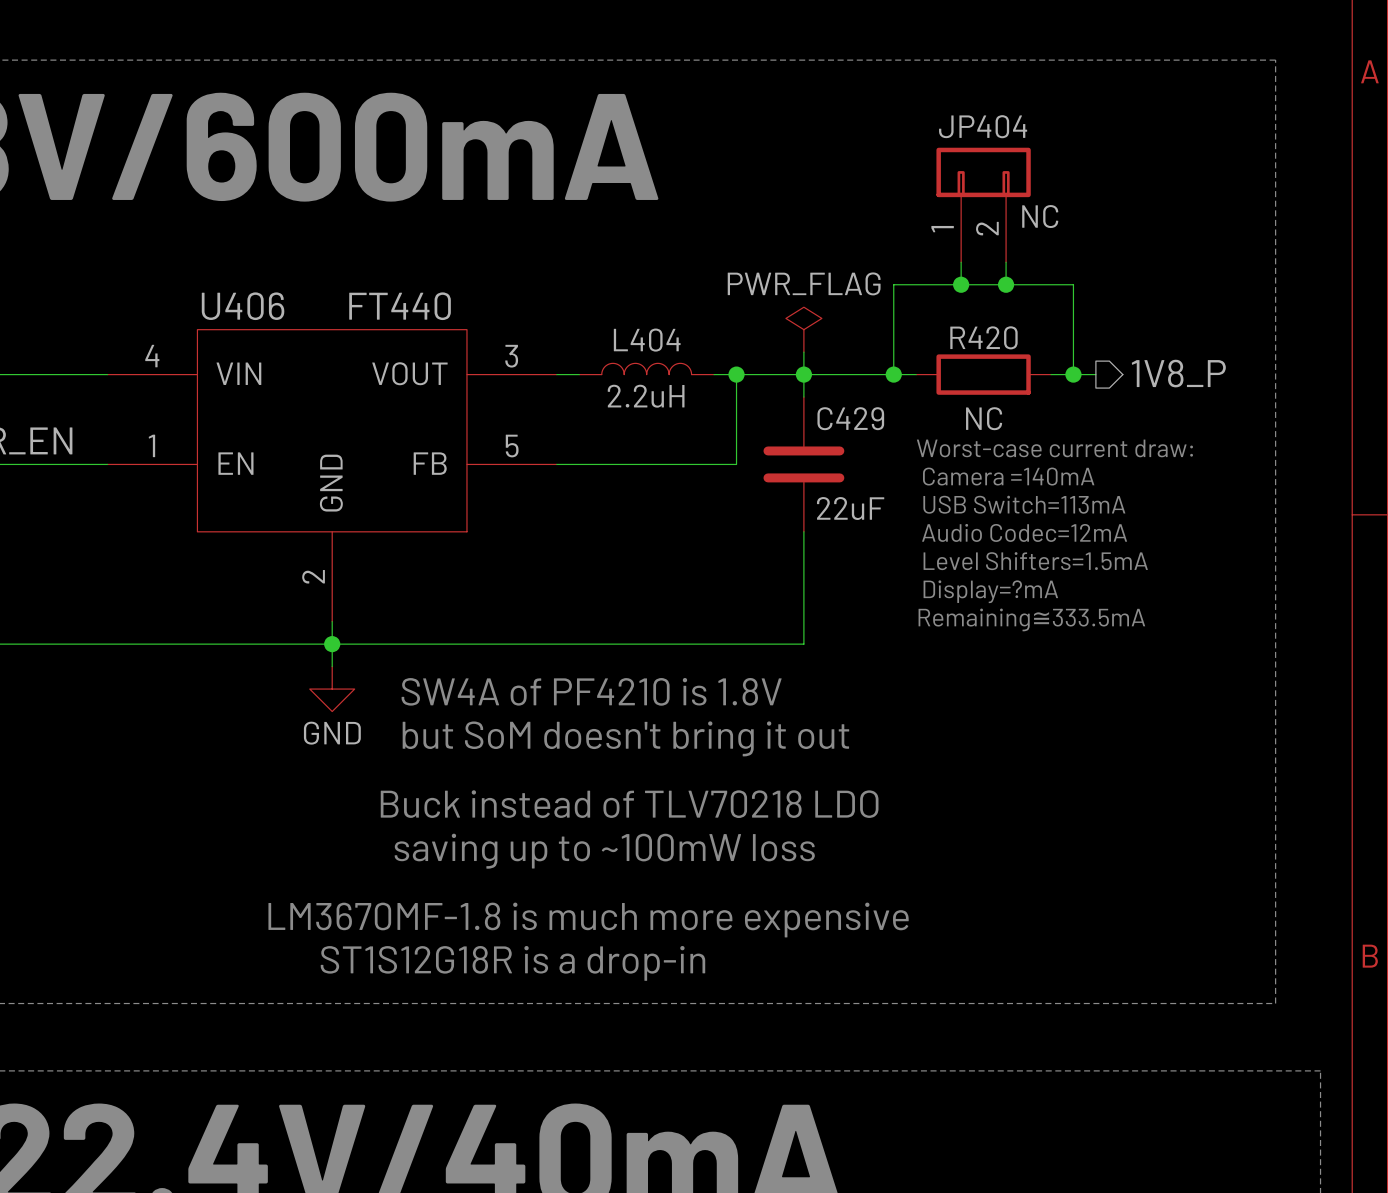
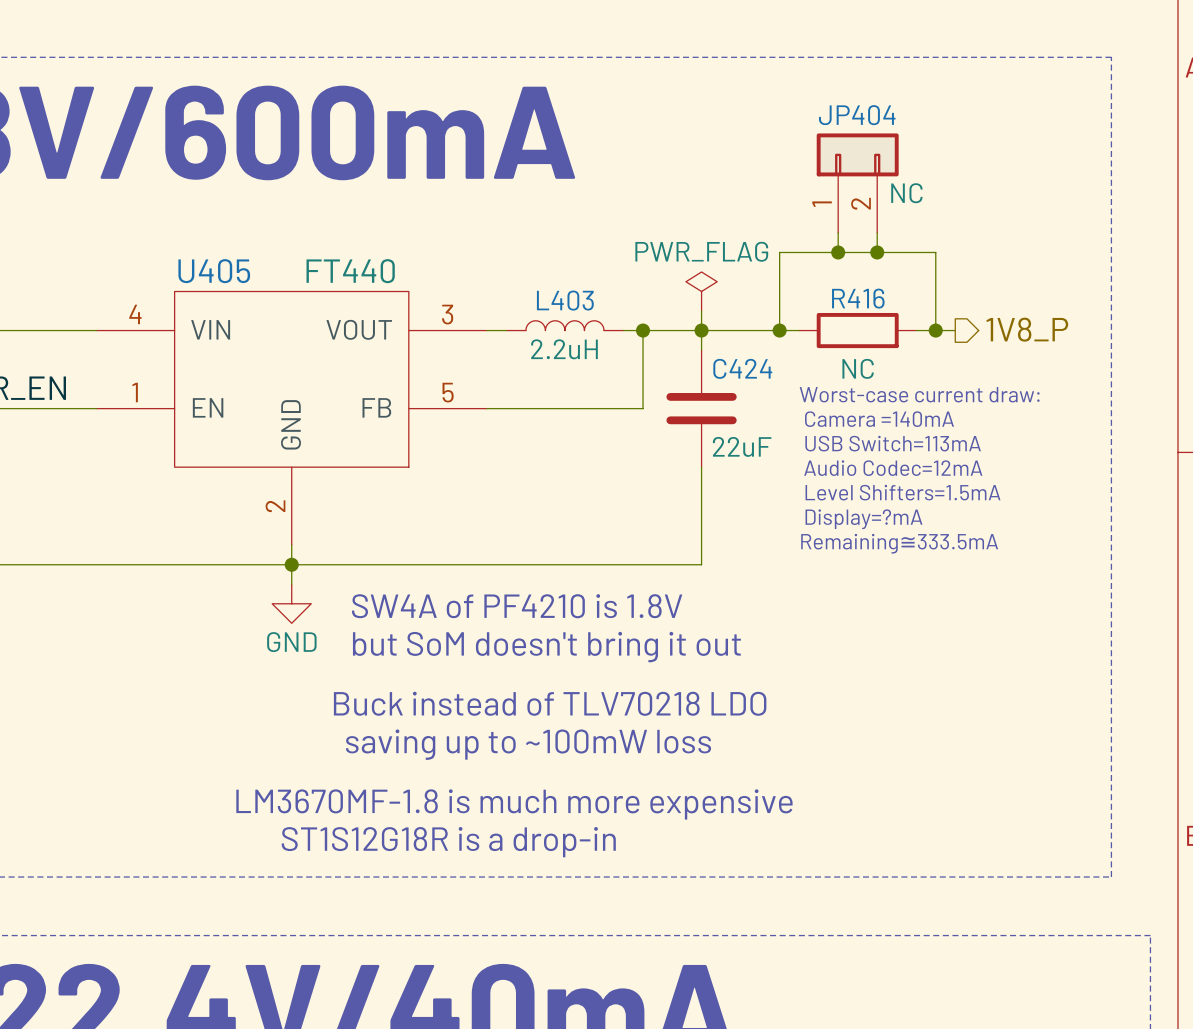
U406 name: U406 (243, 306) -> U405 (214, 271)
R420 name: R420 (983, 337) -> R416 (858, 298)
L404 name: L404 (647, 340) -> L403 (565, 300)
C429 name: C429 (850, 418) -> C424 (742, 368)

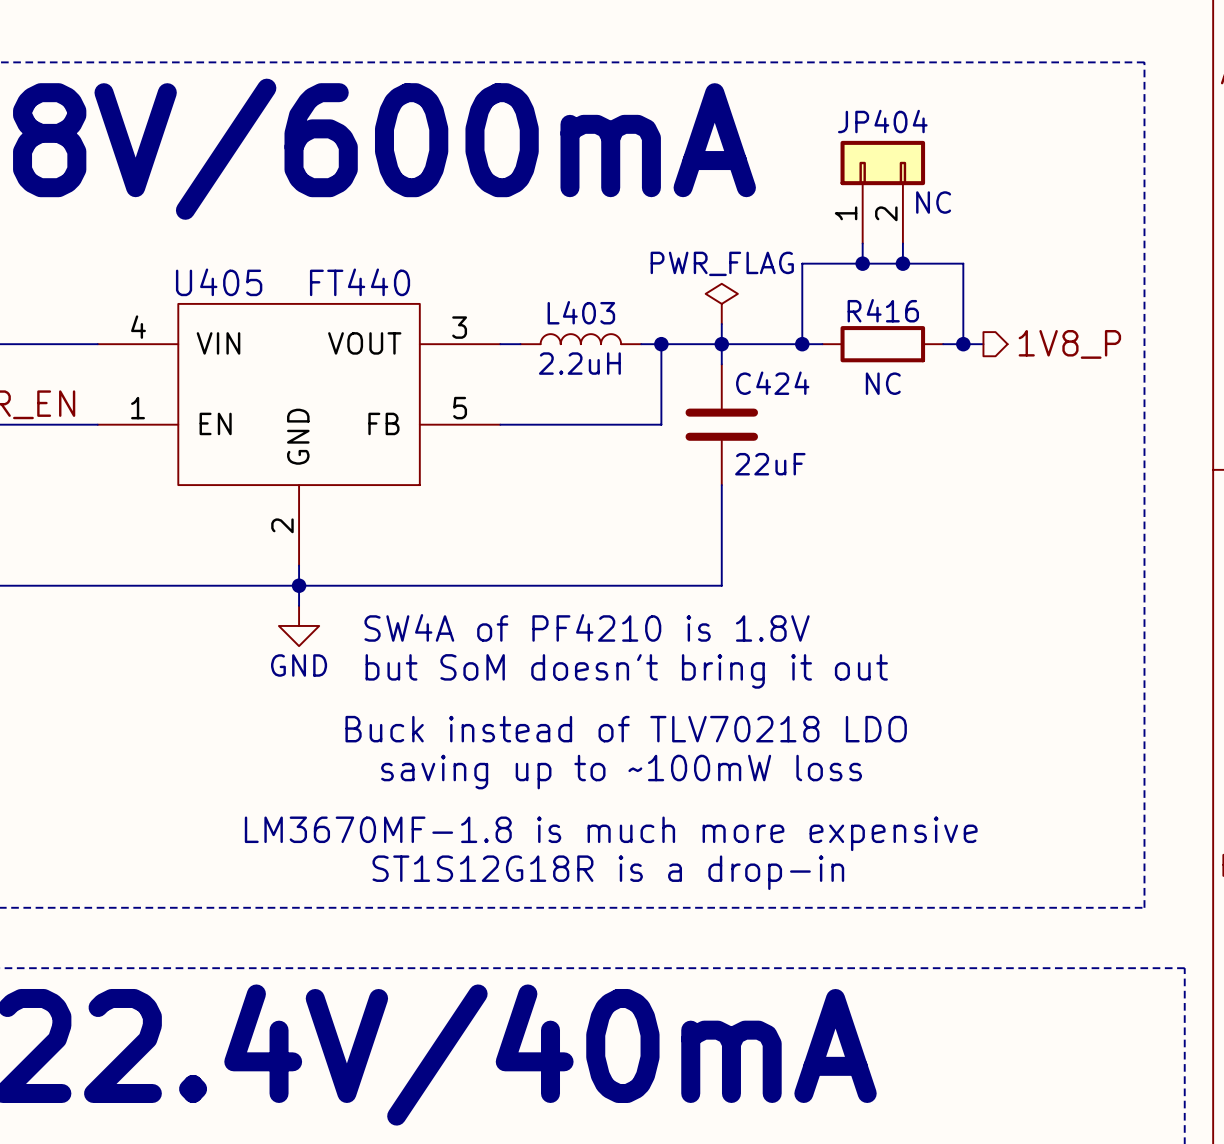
text: Worst-case current draw: (919, 394) -> none
text: Camera =140mA (879, 419) -> none
text: USB Switch=113mA (893, 443) -> none
text: Audio Codec=12mA (893, 468) -> none
text: Level Shifters=1.5mA (902, 492) -> none
text: Display=?mA (863, 519) -> none
text: Remaining≅333.5mA (899, 543) -> none

